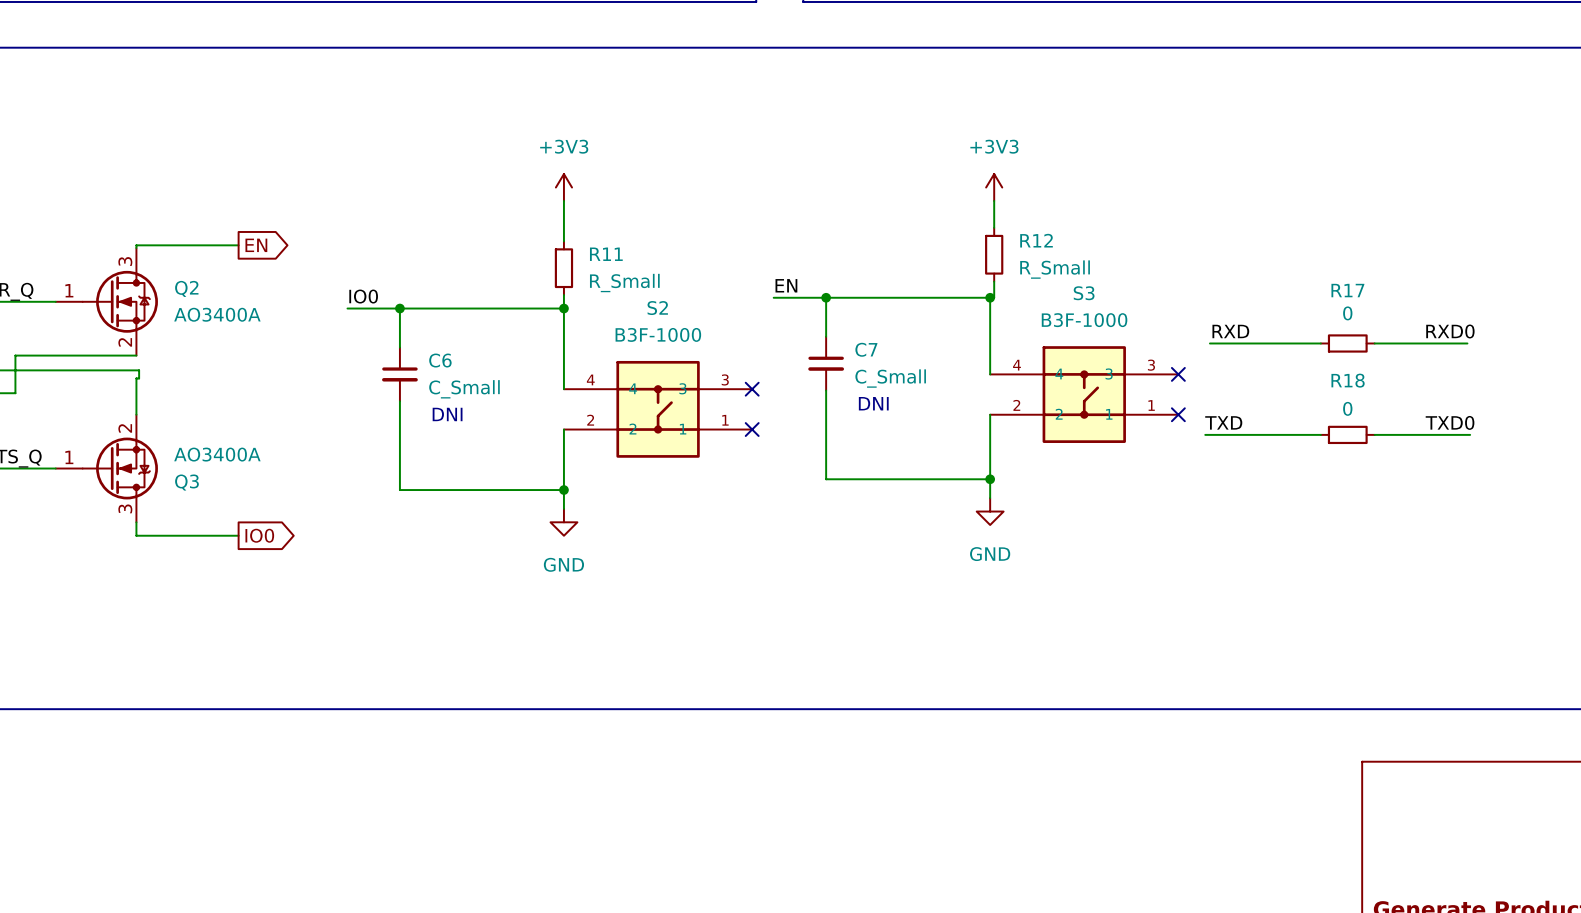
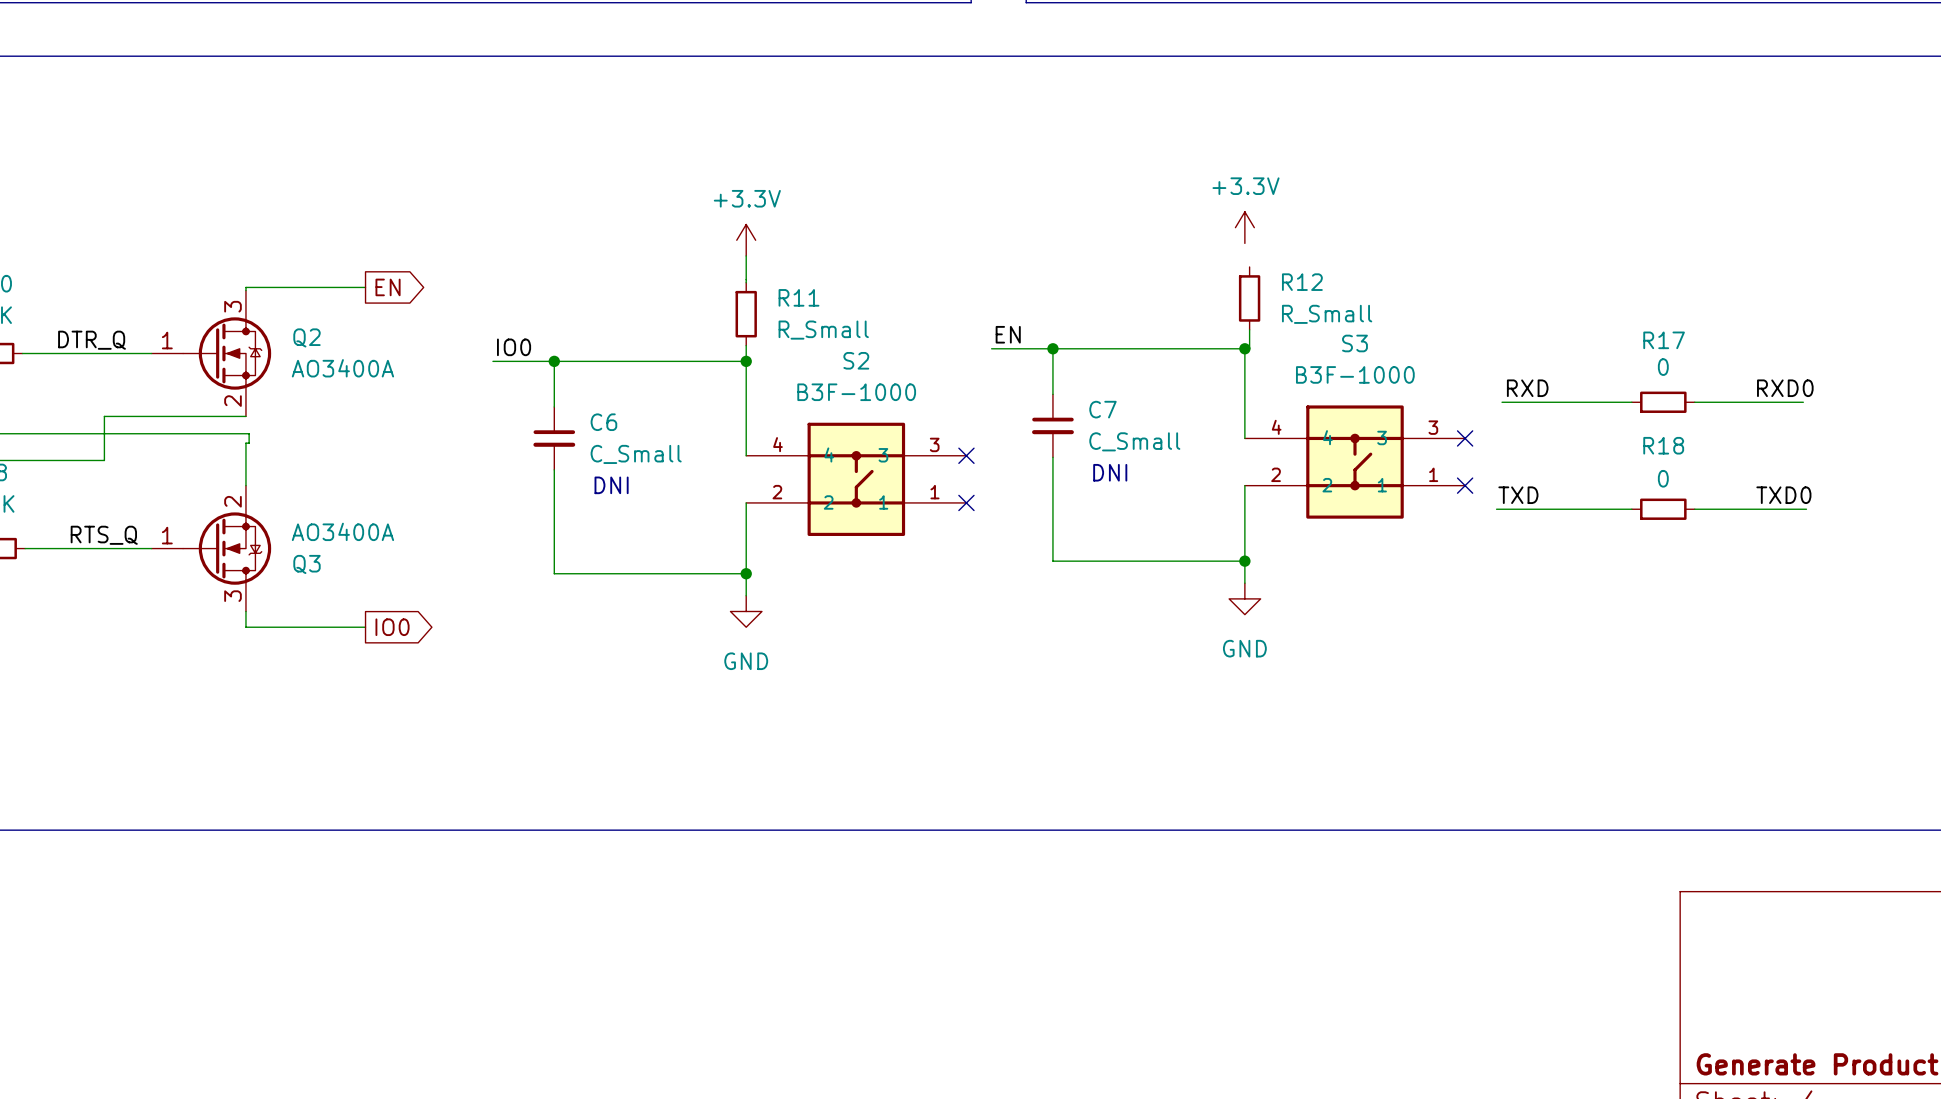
power symbol: +3V3 (563, 187) -> none
power symbol: +3V3 (994, 187) -> +3.3V (1244, 227)
wire: (994, 200) (994, 227) -> none
power symbol: none -> +3.3V (746, 240)

